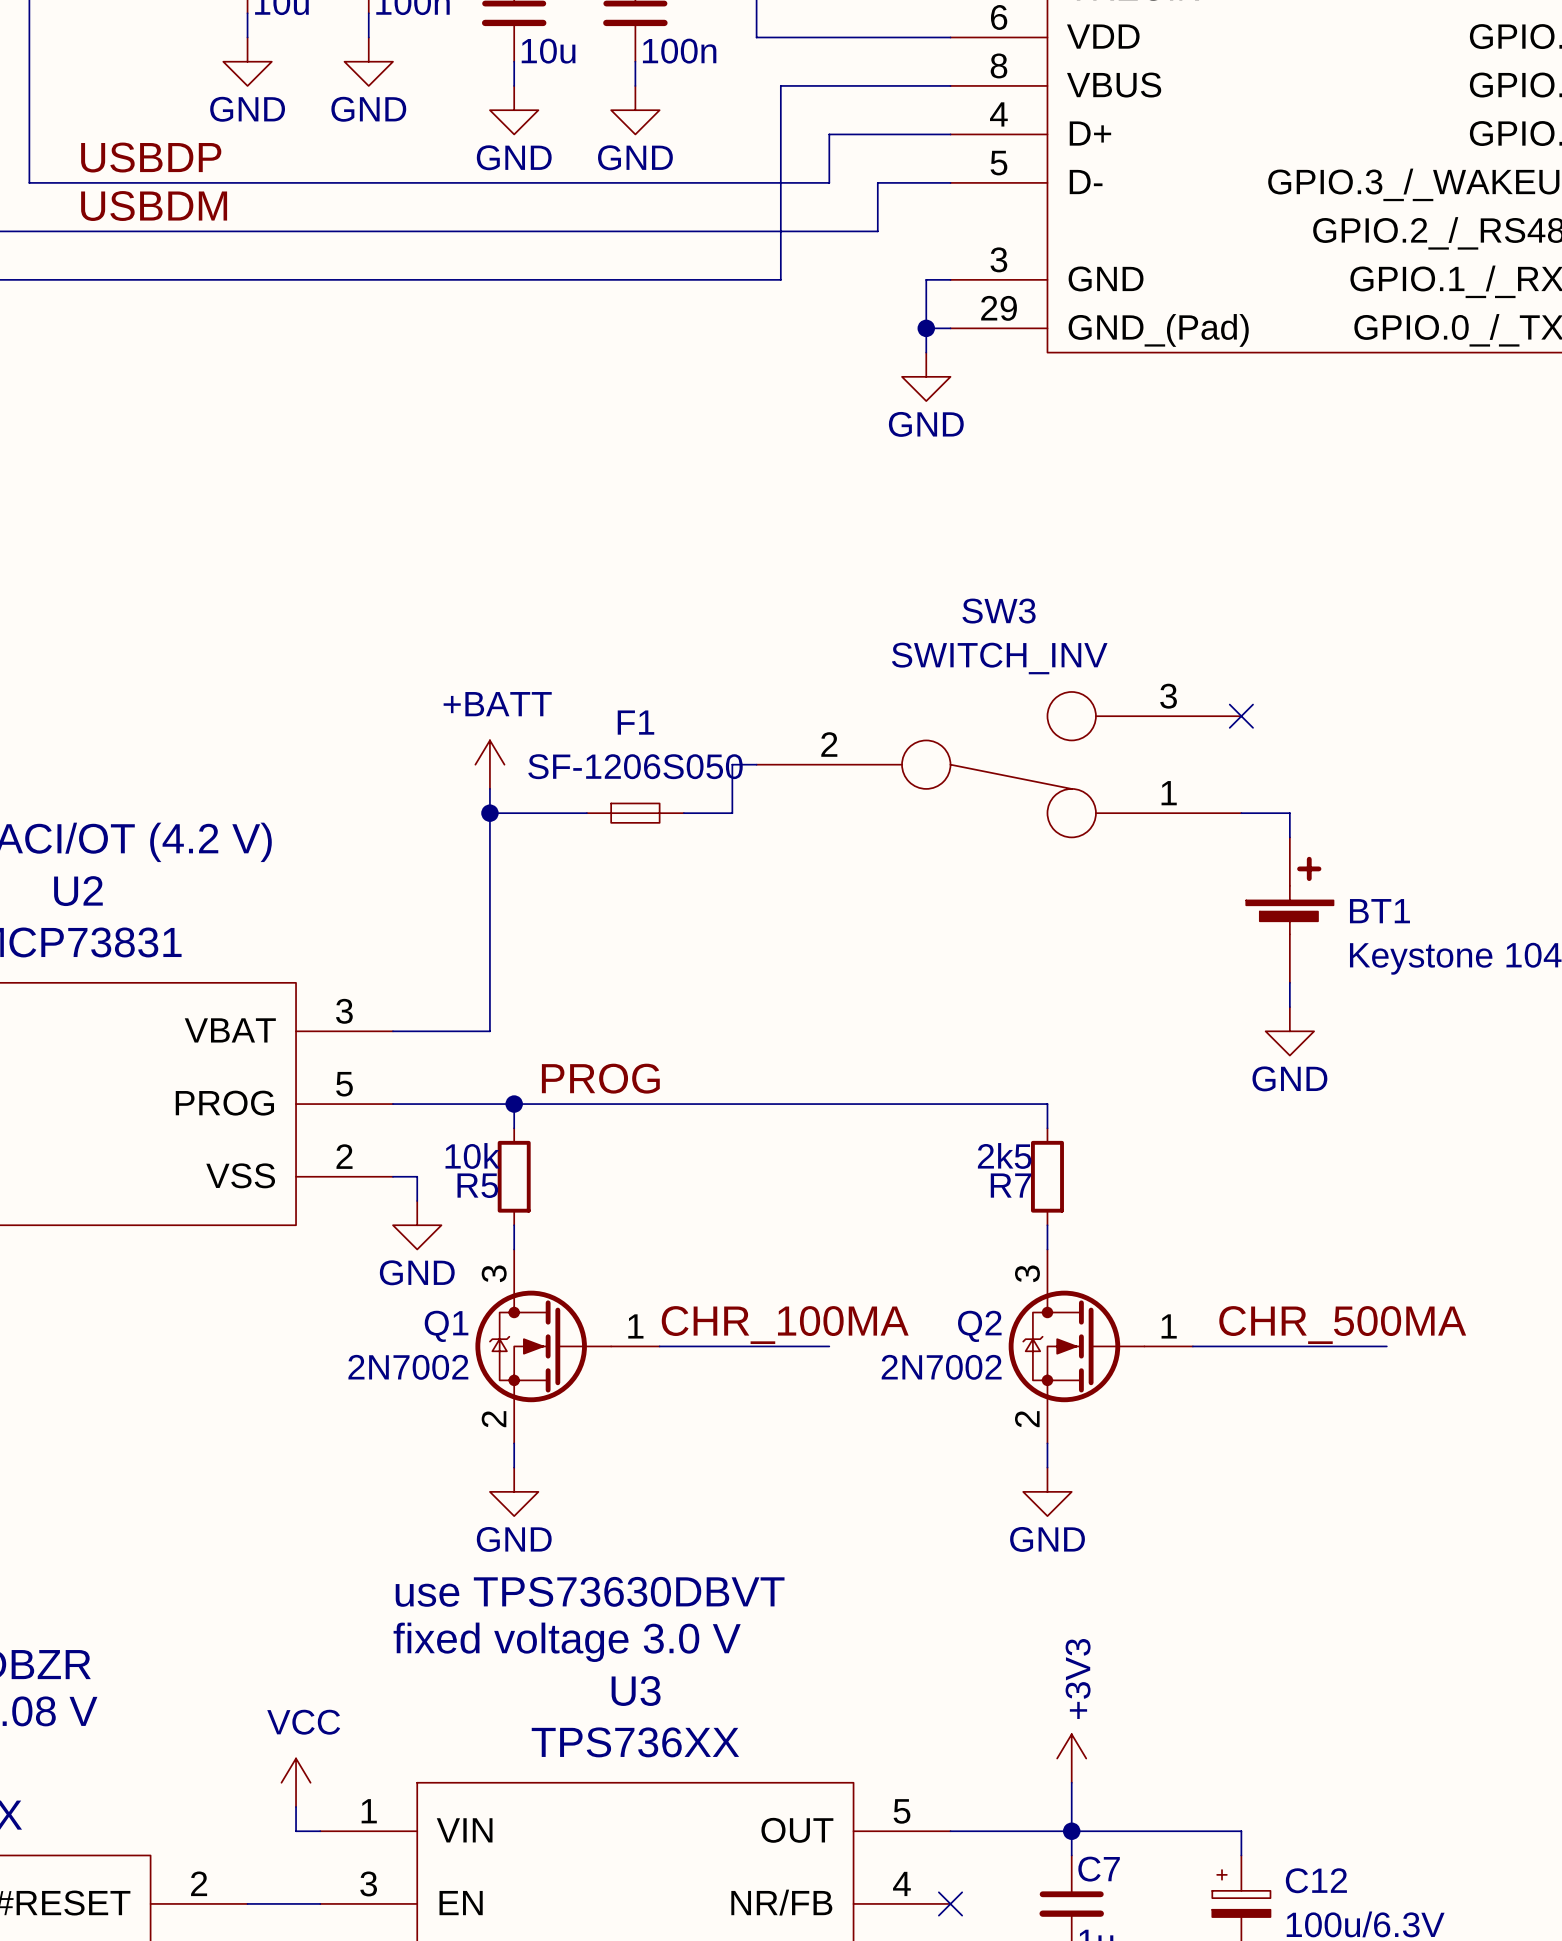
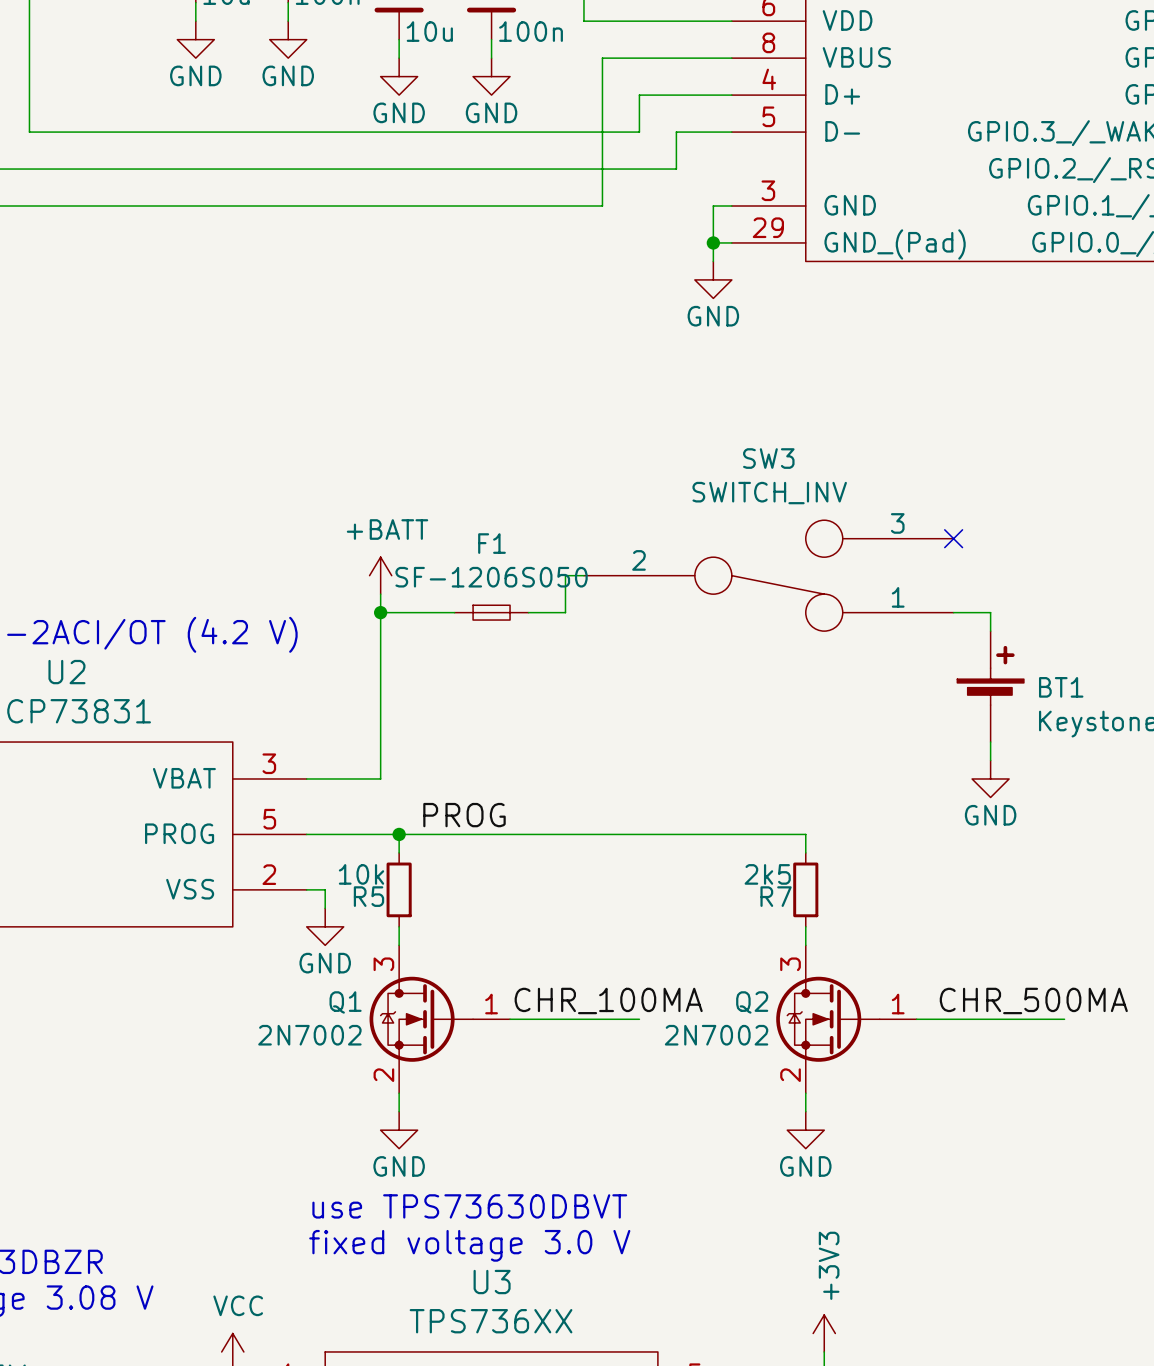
label: USBDP (151, 157) -> none
label: USBDM (154, 206) -> none

